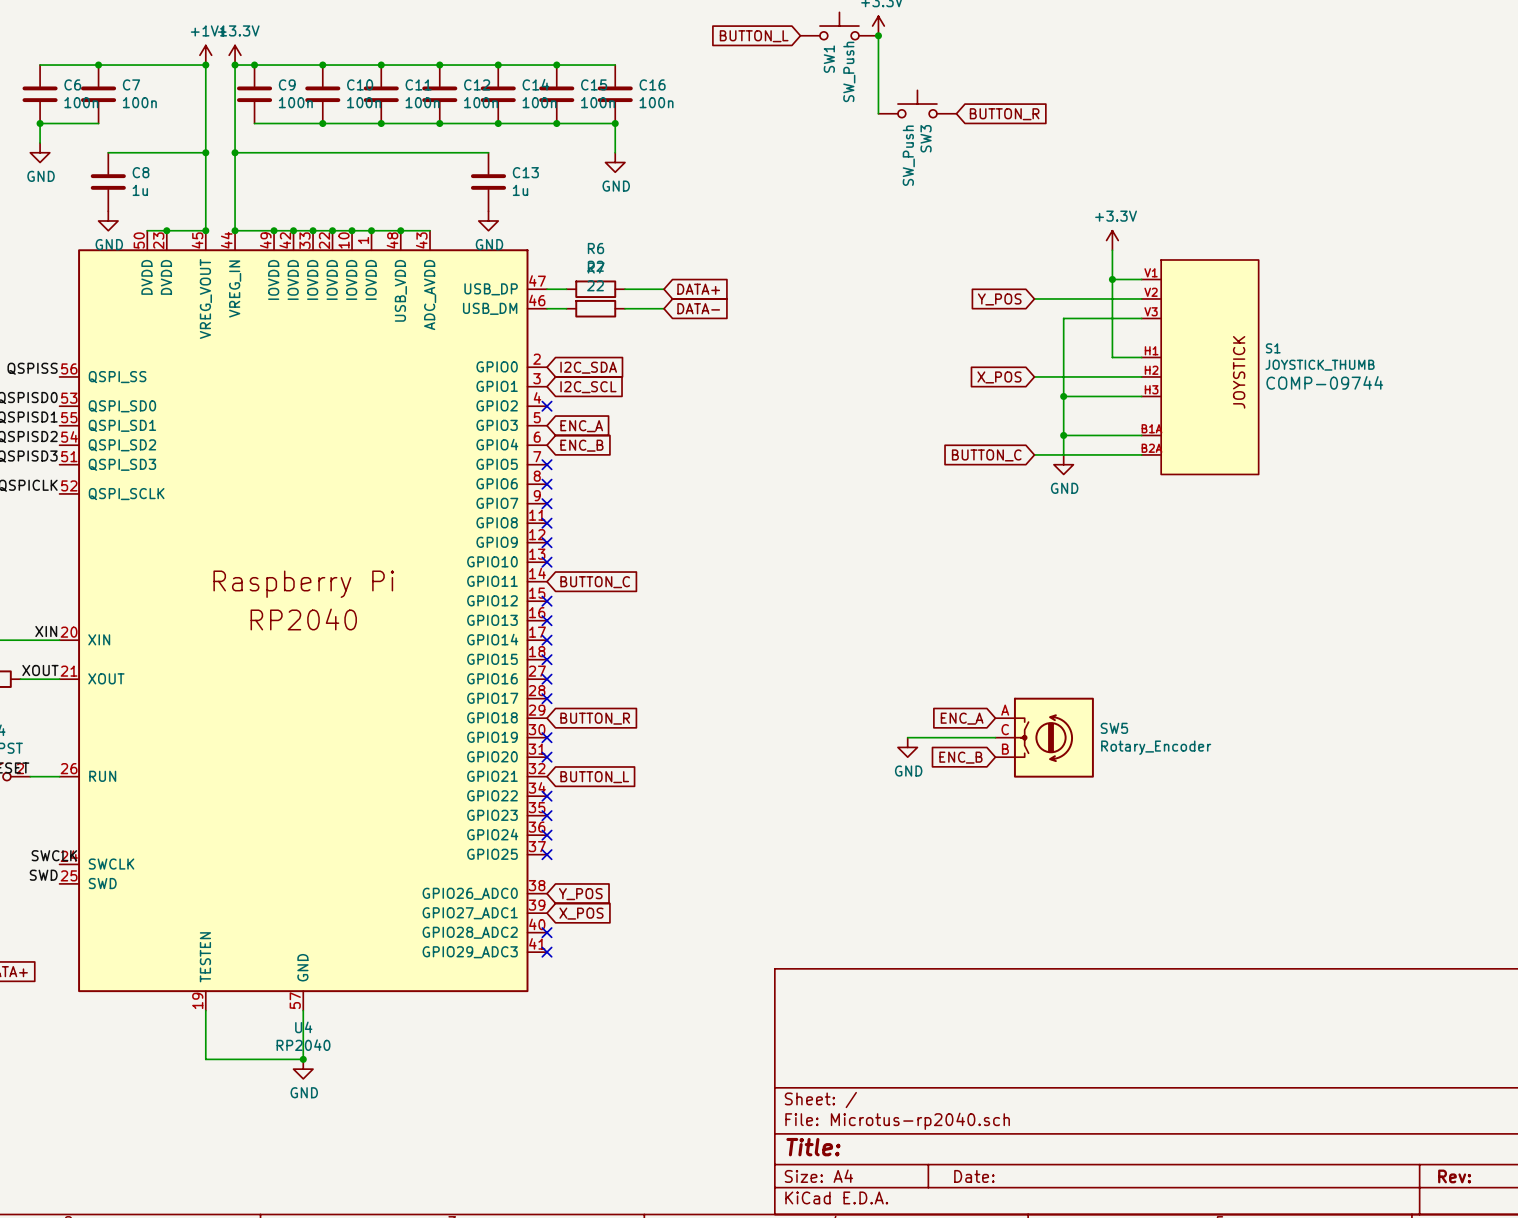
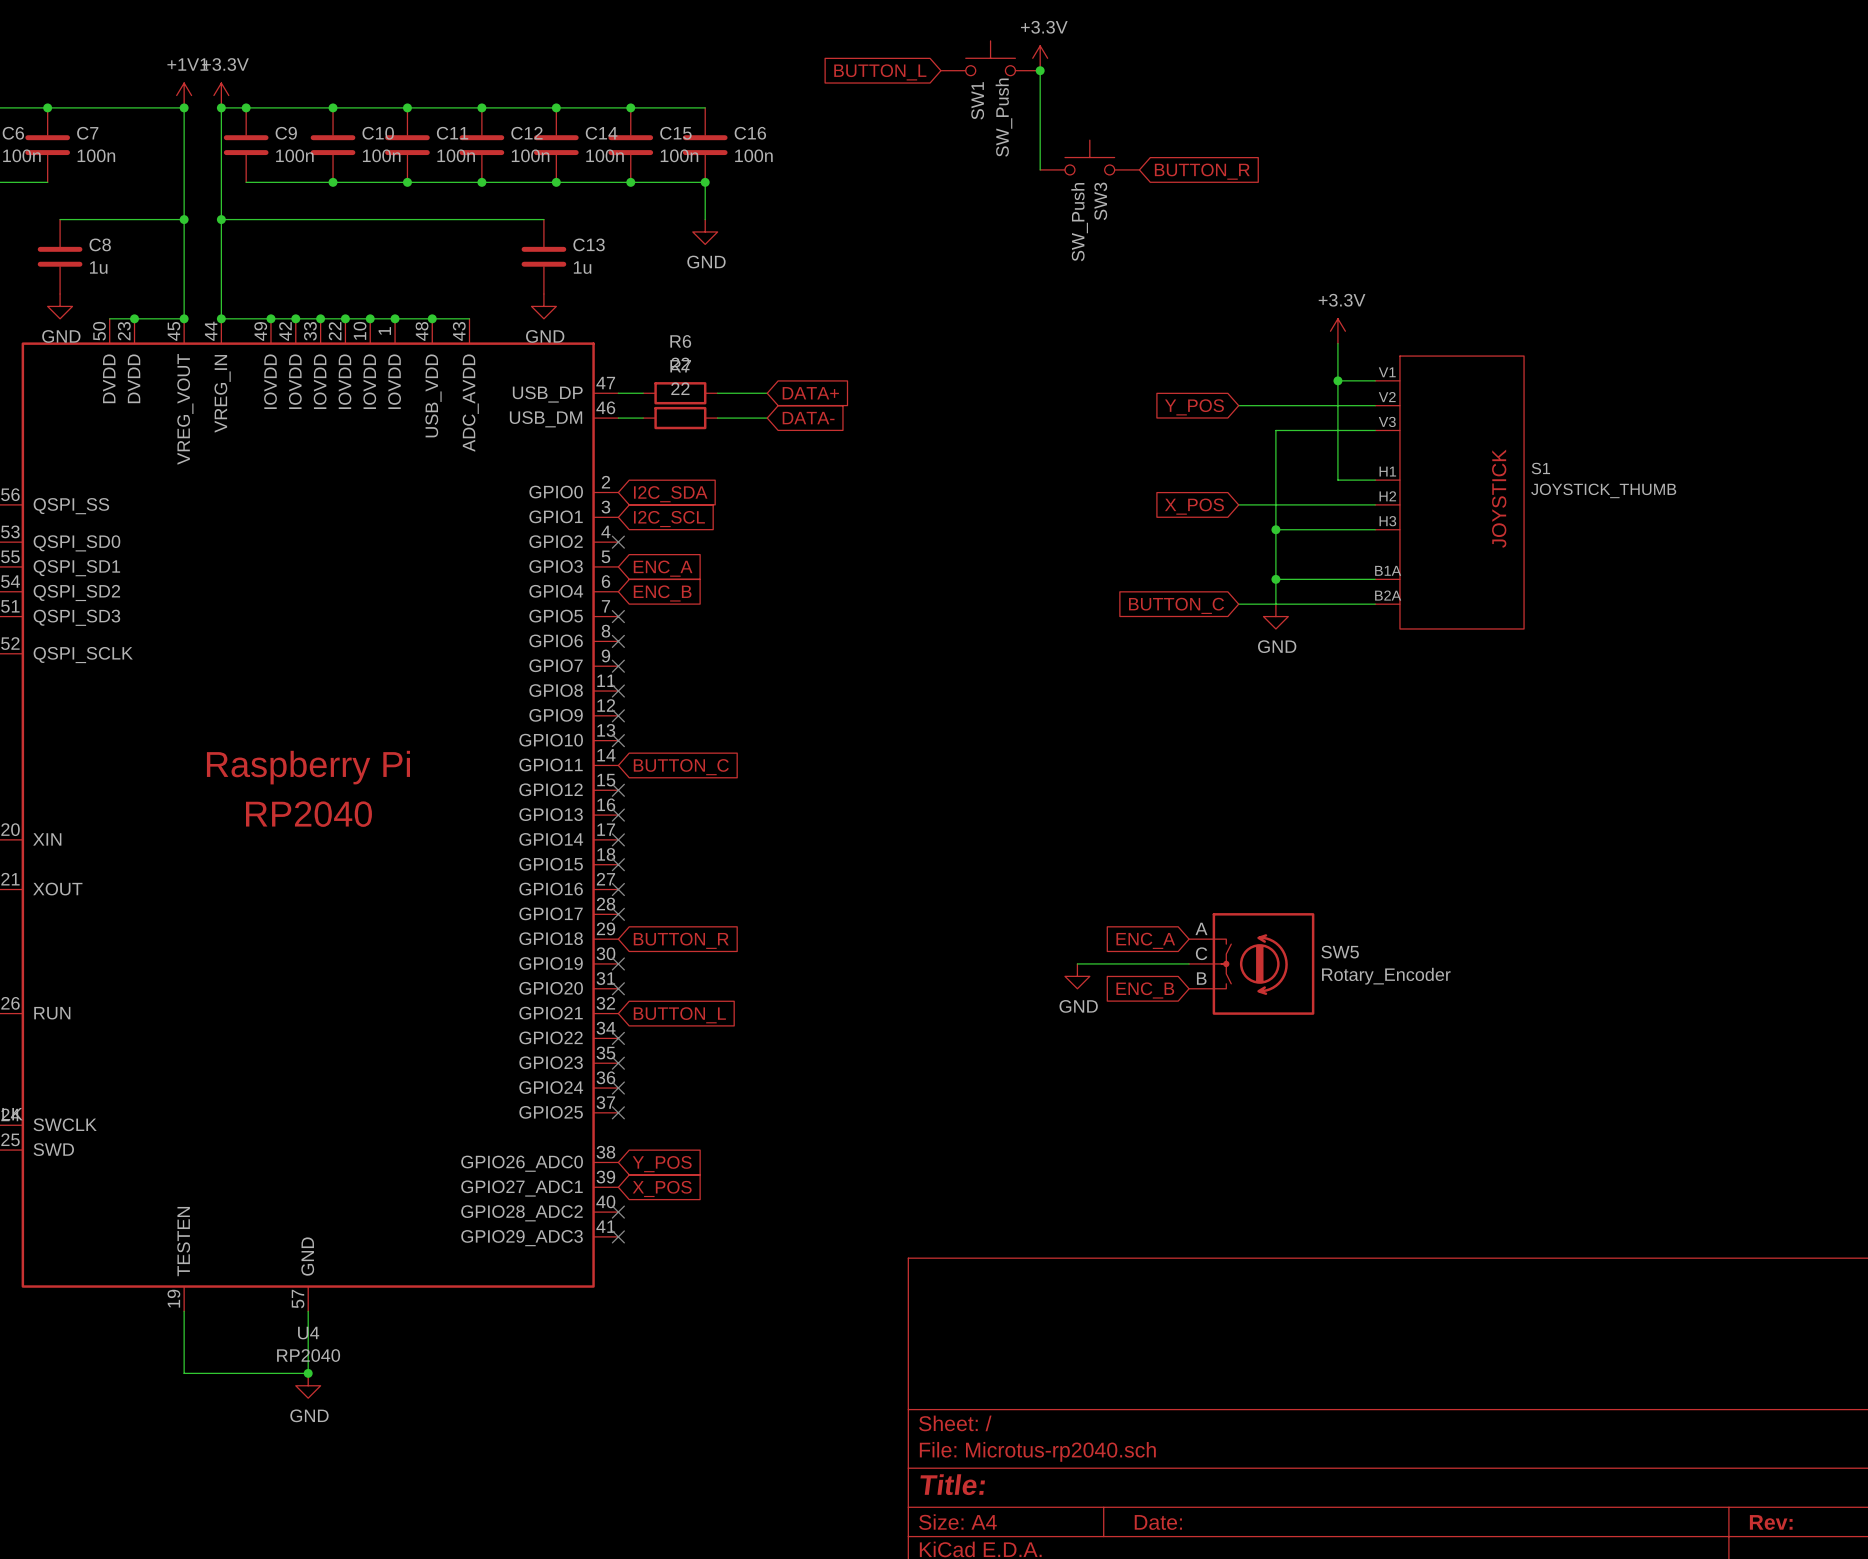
S1 text: COMP-09744 (1324, 382) -> none

